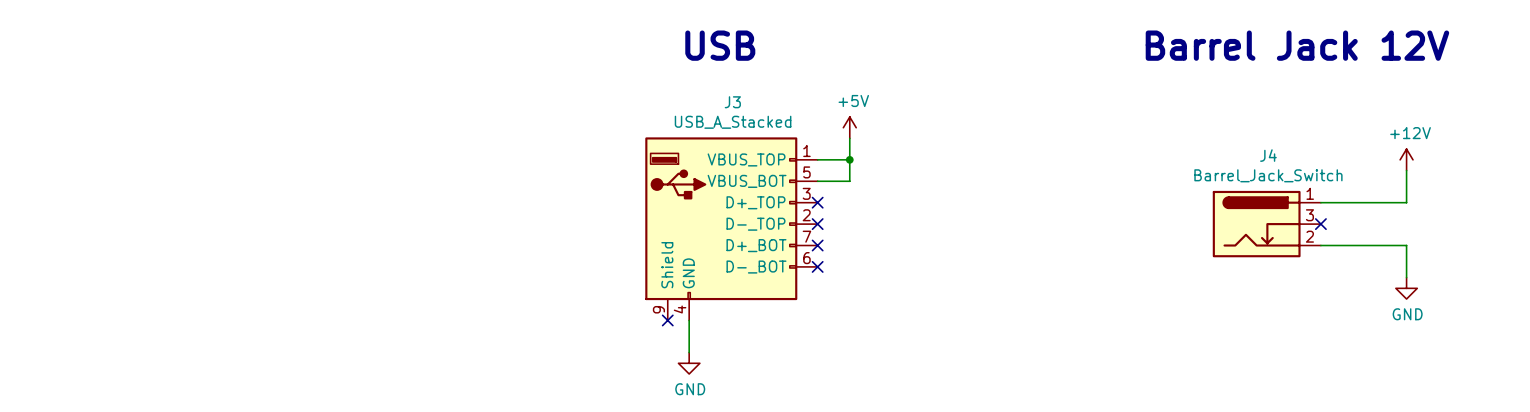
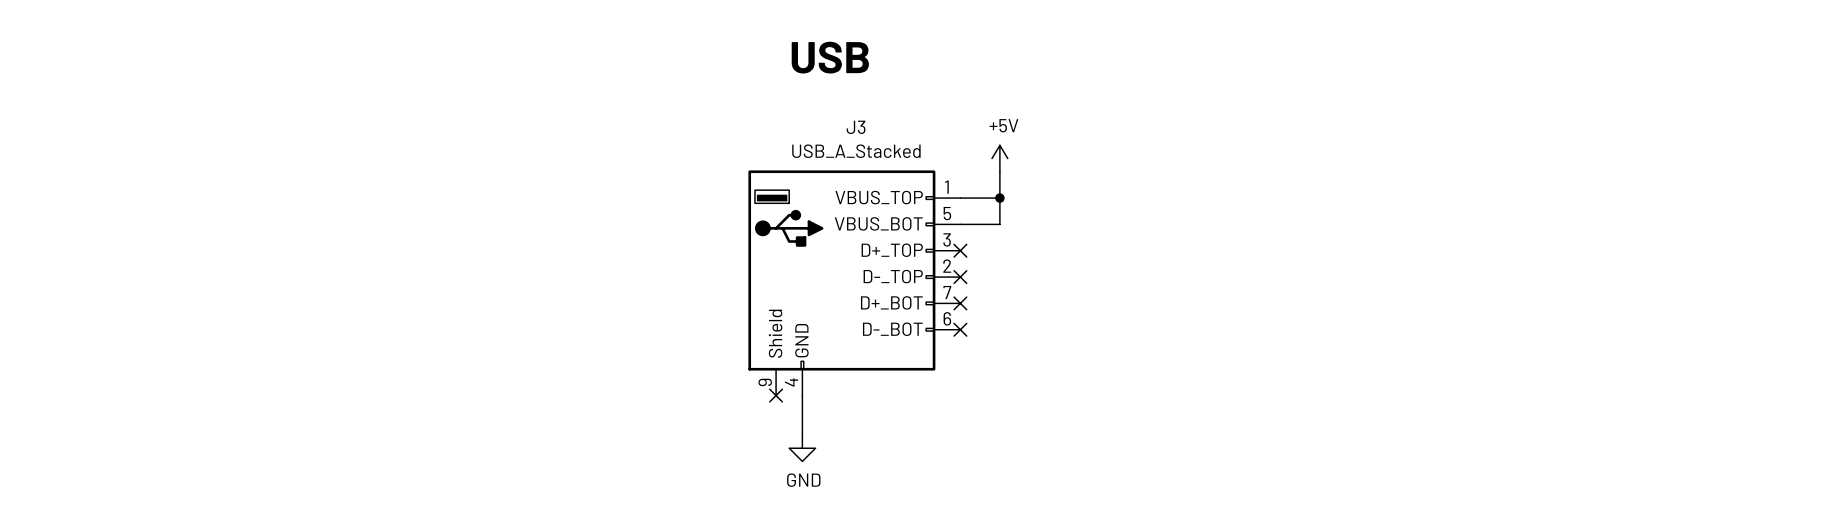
text: Barrel Jack 12V (1297, 45) -> none
power symbol: +12V (1406, 159) -> none
wire: (1406, 170) (1406, 202) (1320, 202) -> none
J4: Barrel_Jack_Switch (1266, 224) -> none
no-connect mark: (1320, 224) -> none
wire: (1320, 245) (1406, 245) (1406, 277) -> none
power symbol: GND (1406, 288) -> none

